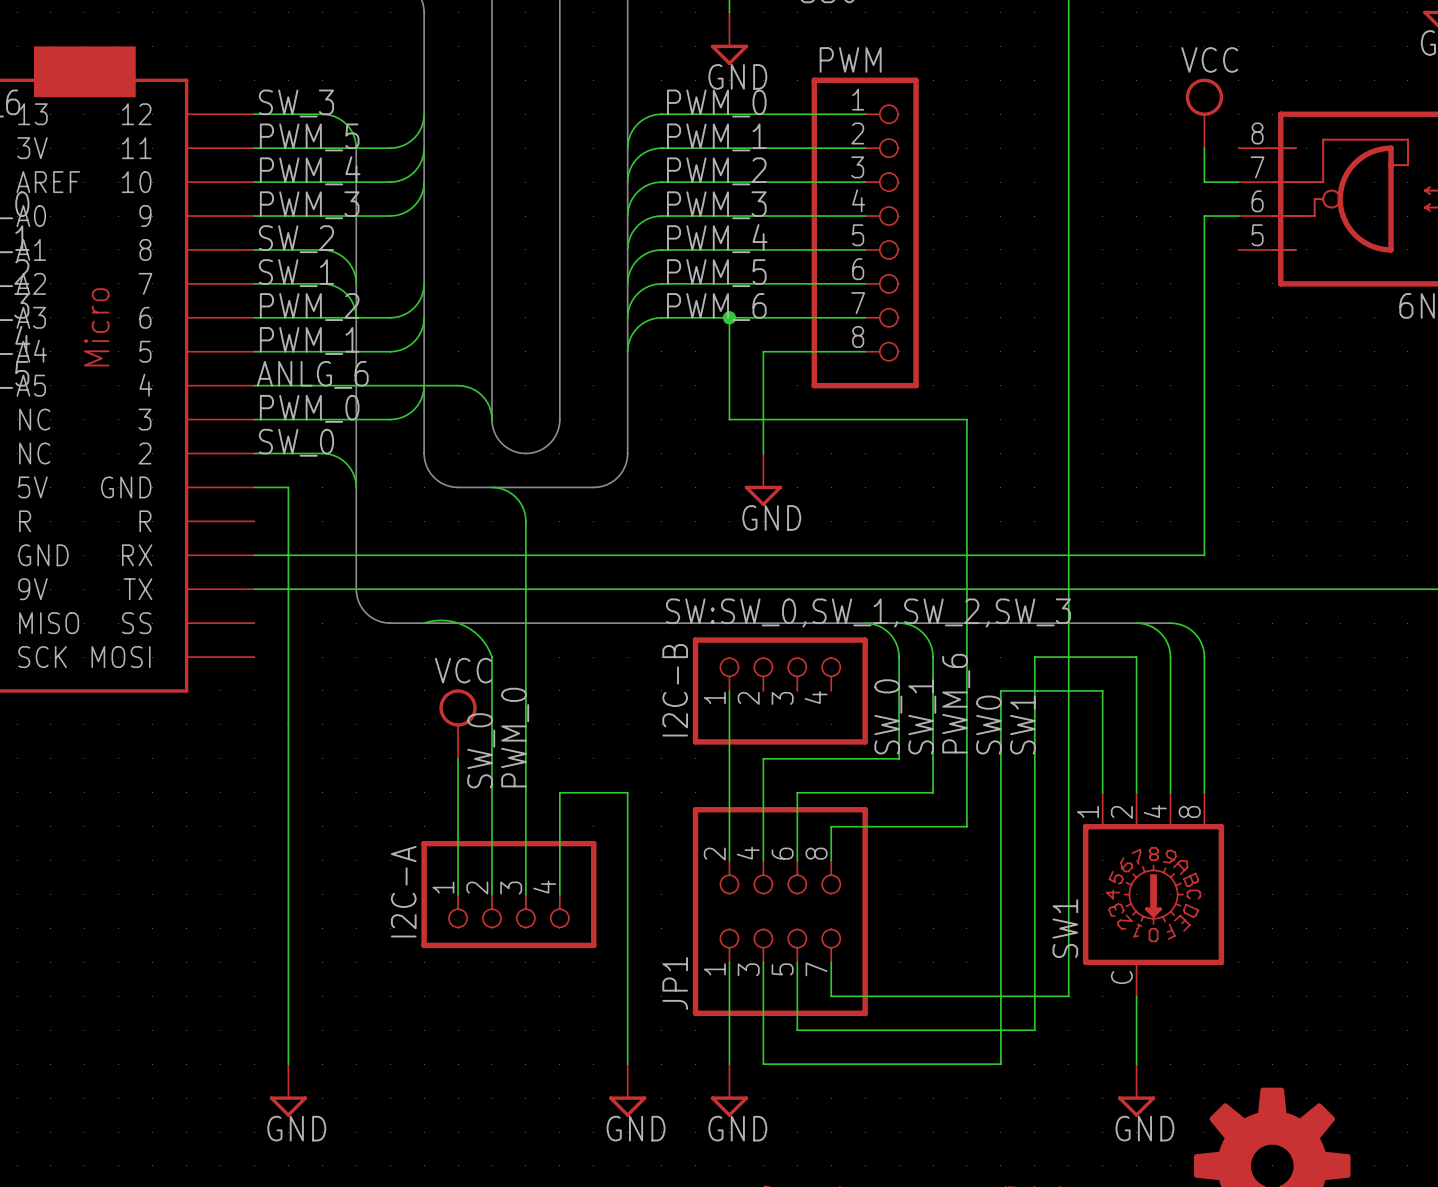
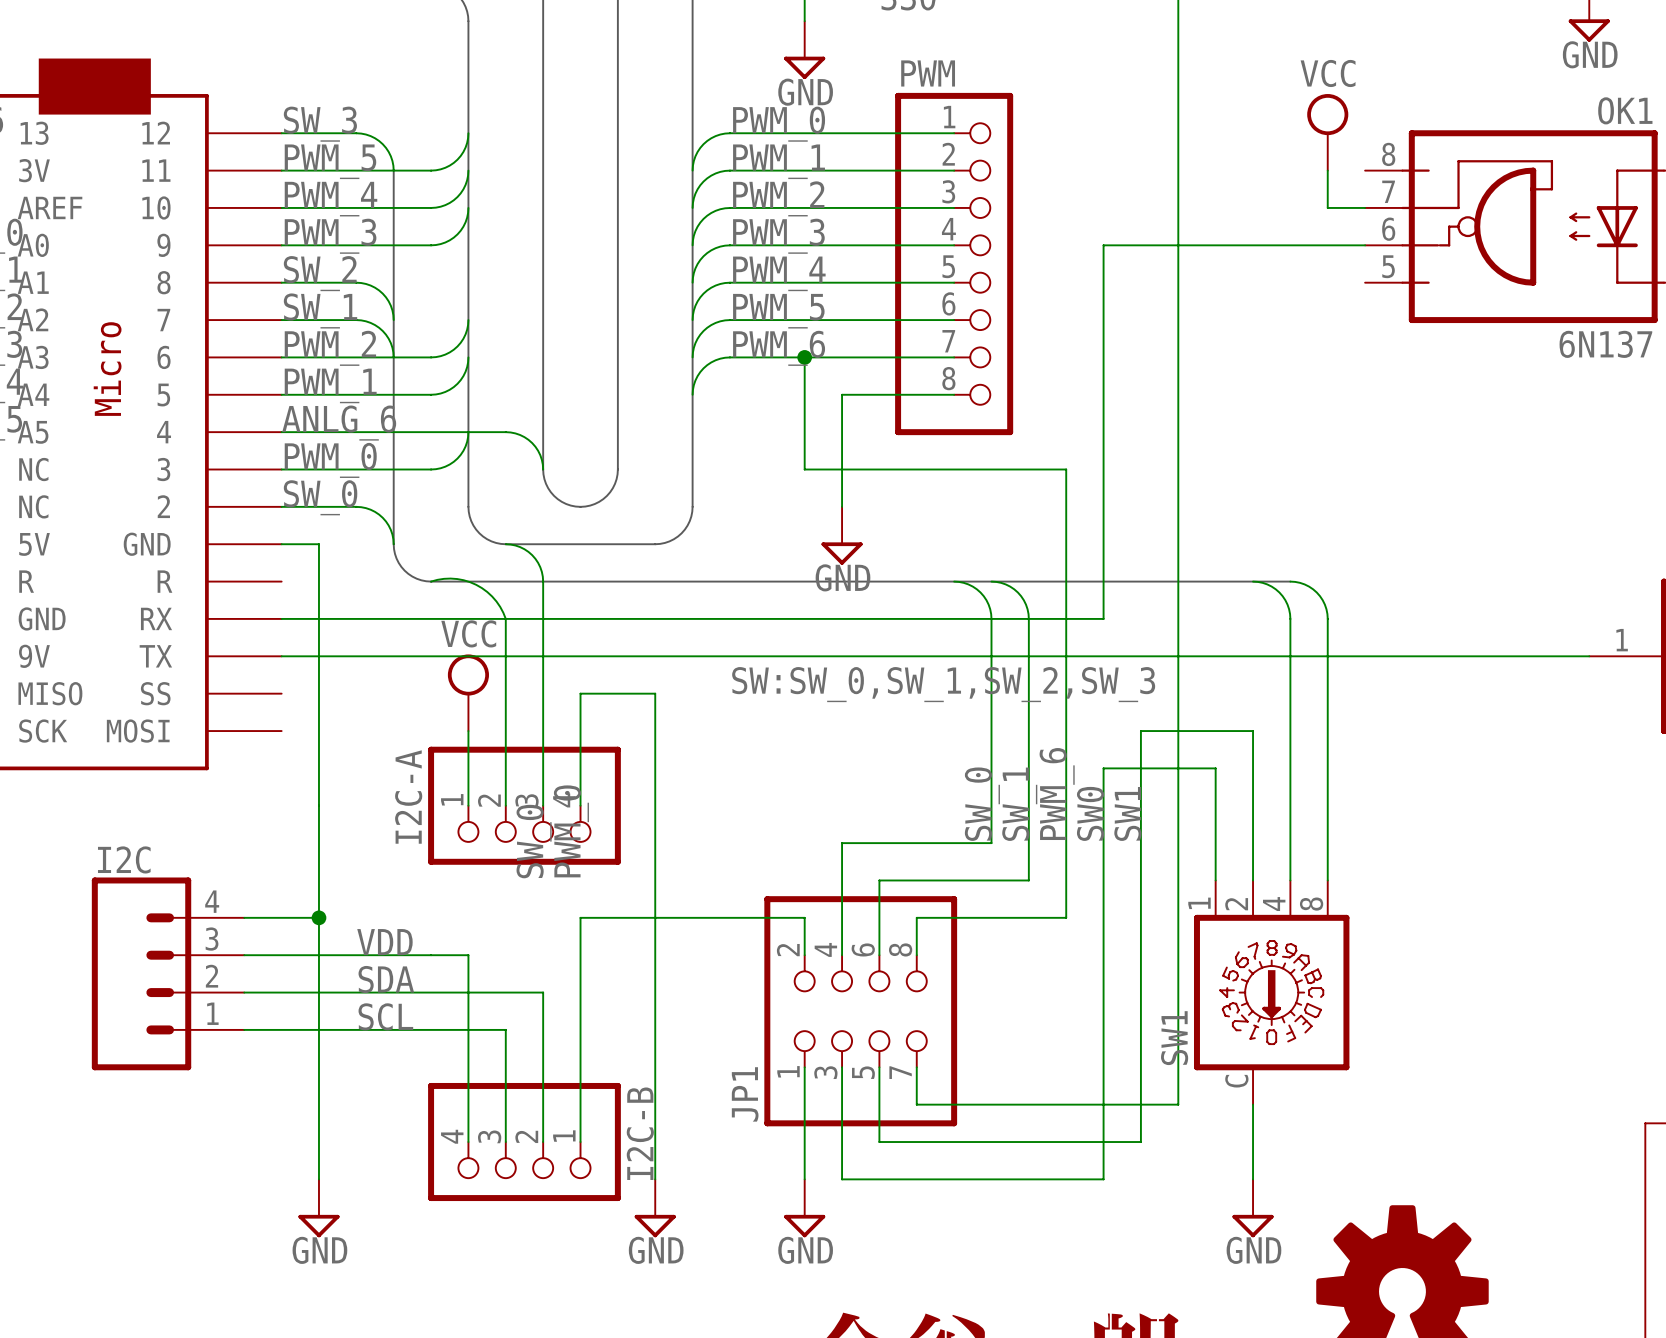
wire: (1204, 216) (1204, 555) (1000, 555) -> (1327, 245) (1103, 245) (1103, 618)
bus: (356, 487) (357, 597) (366, 613) (377, 620) (385, 622) (1170, 623) -> (393, 544) (396, 558) (404, 570) (416, 578) (431, 581) (1290, 581)
wire: (491, 487) (504, 490) (512, 494) (518, 500) (524, 512) (525, 623) -> (655, 1179) (655, 693) (580, 693)
wire: none -> (431, 581) (450, 578) (476, 584) (492, 596) (505, 618) (505, 805)
wire: (424, 623) (441, 620) (465, 626) (479, 636) (491, 657) -> (505, 544) (520, 547) (528, 551) (535, 558) (541, 571) (543, 731)
wire: (865, 623) (878, 625) (889, 633) (896, 644) (899, 657) -> (954, 581) (968, 584) (976, 589) (986, 600) (990, 609) (991, 731)
wire: (899, 623) (912, 625) (923, 633) (930, 644) (933, 657) -> (991, 581) (1005, 584) (1014, 589) (1021, 596) (1027, 609) (1028, 731)
wire: (1136, 623) (1149, 625) (1160, 633) (1167, 644) (1170, 657) -> (1253, 581) (1262, 582) (1275, 589) (1282, 596) (1289, 609) (1290, 731)
wire: (1170, 623) (1183, 625) (1194, 633) (1201, 644) (1204, 657) -> (1290, 581) (1300, 582) (1313, 589) (1322, 600) (1326, 609) (1327, 731)
wire: none -> (468, 731) (468, 805)
wire: (729, 690) (729, 826) -> none
I2C-B rotation: 0° (780, 690) -> 180° (524, 1142)
I2C-B position: (780, 690) -> (524, 1142)
power symbol position: VCC (458, 724) -> VCC (468, 692)
wire: (491, 724) (491, 894) -> none
wire: (525, 724) (525, 826) -> (804, 917) (580, 917)
wire: (458, 758) (458, 894) -> (580, 992) (580, 1142)
wire: none -> (244, 917) (318, 917)
junction: none -> (318, 917)
label: none -> VDD (384, 942)
wire: none -> (244, 955) (468, 955) (468, 1142)
I2C: none -> (168, 973)
label: none -> SDA (386, 979)
wire: none -> (244, 992) (543, 992) (543, 1142)
I2C-A position: (508, 894) -> (524, 805)
wire: (559, 894) (559, 792) (627, 792) (627, 1064) -> none
label: none -> SCL (385, 1016)
wire: none -> (244, 1029) (505, 1029) (505, 1142)
power symbol position: GND (627, 1090) -> GND (655, 1208)

